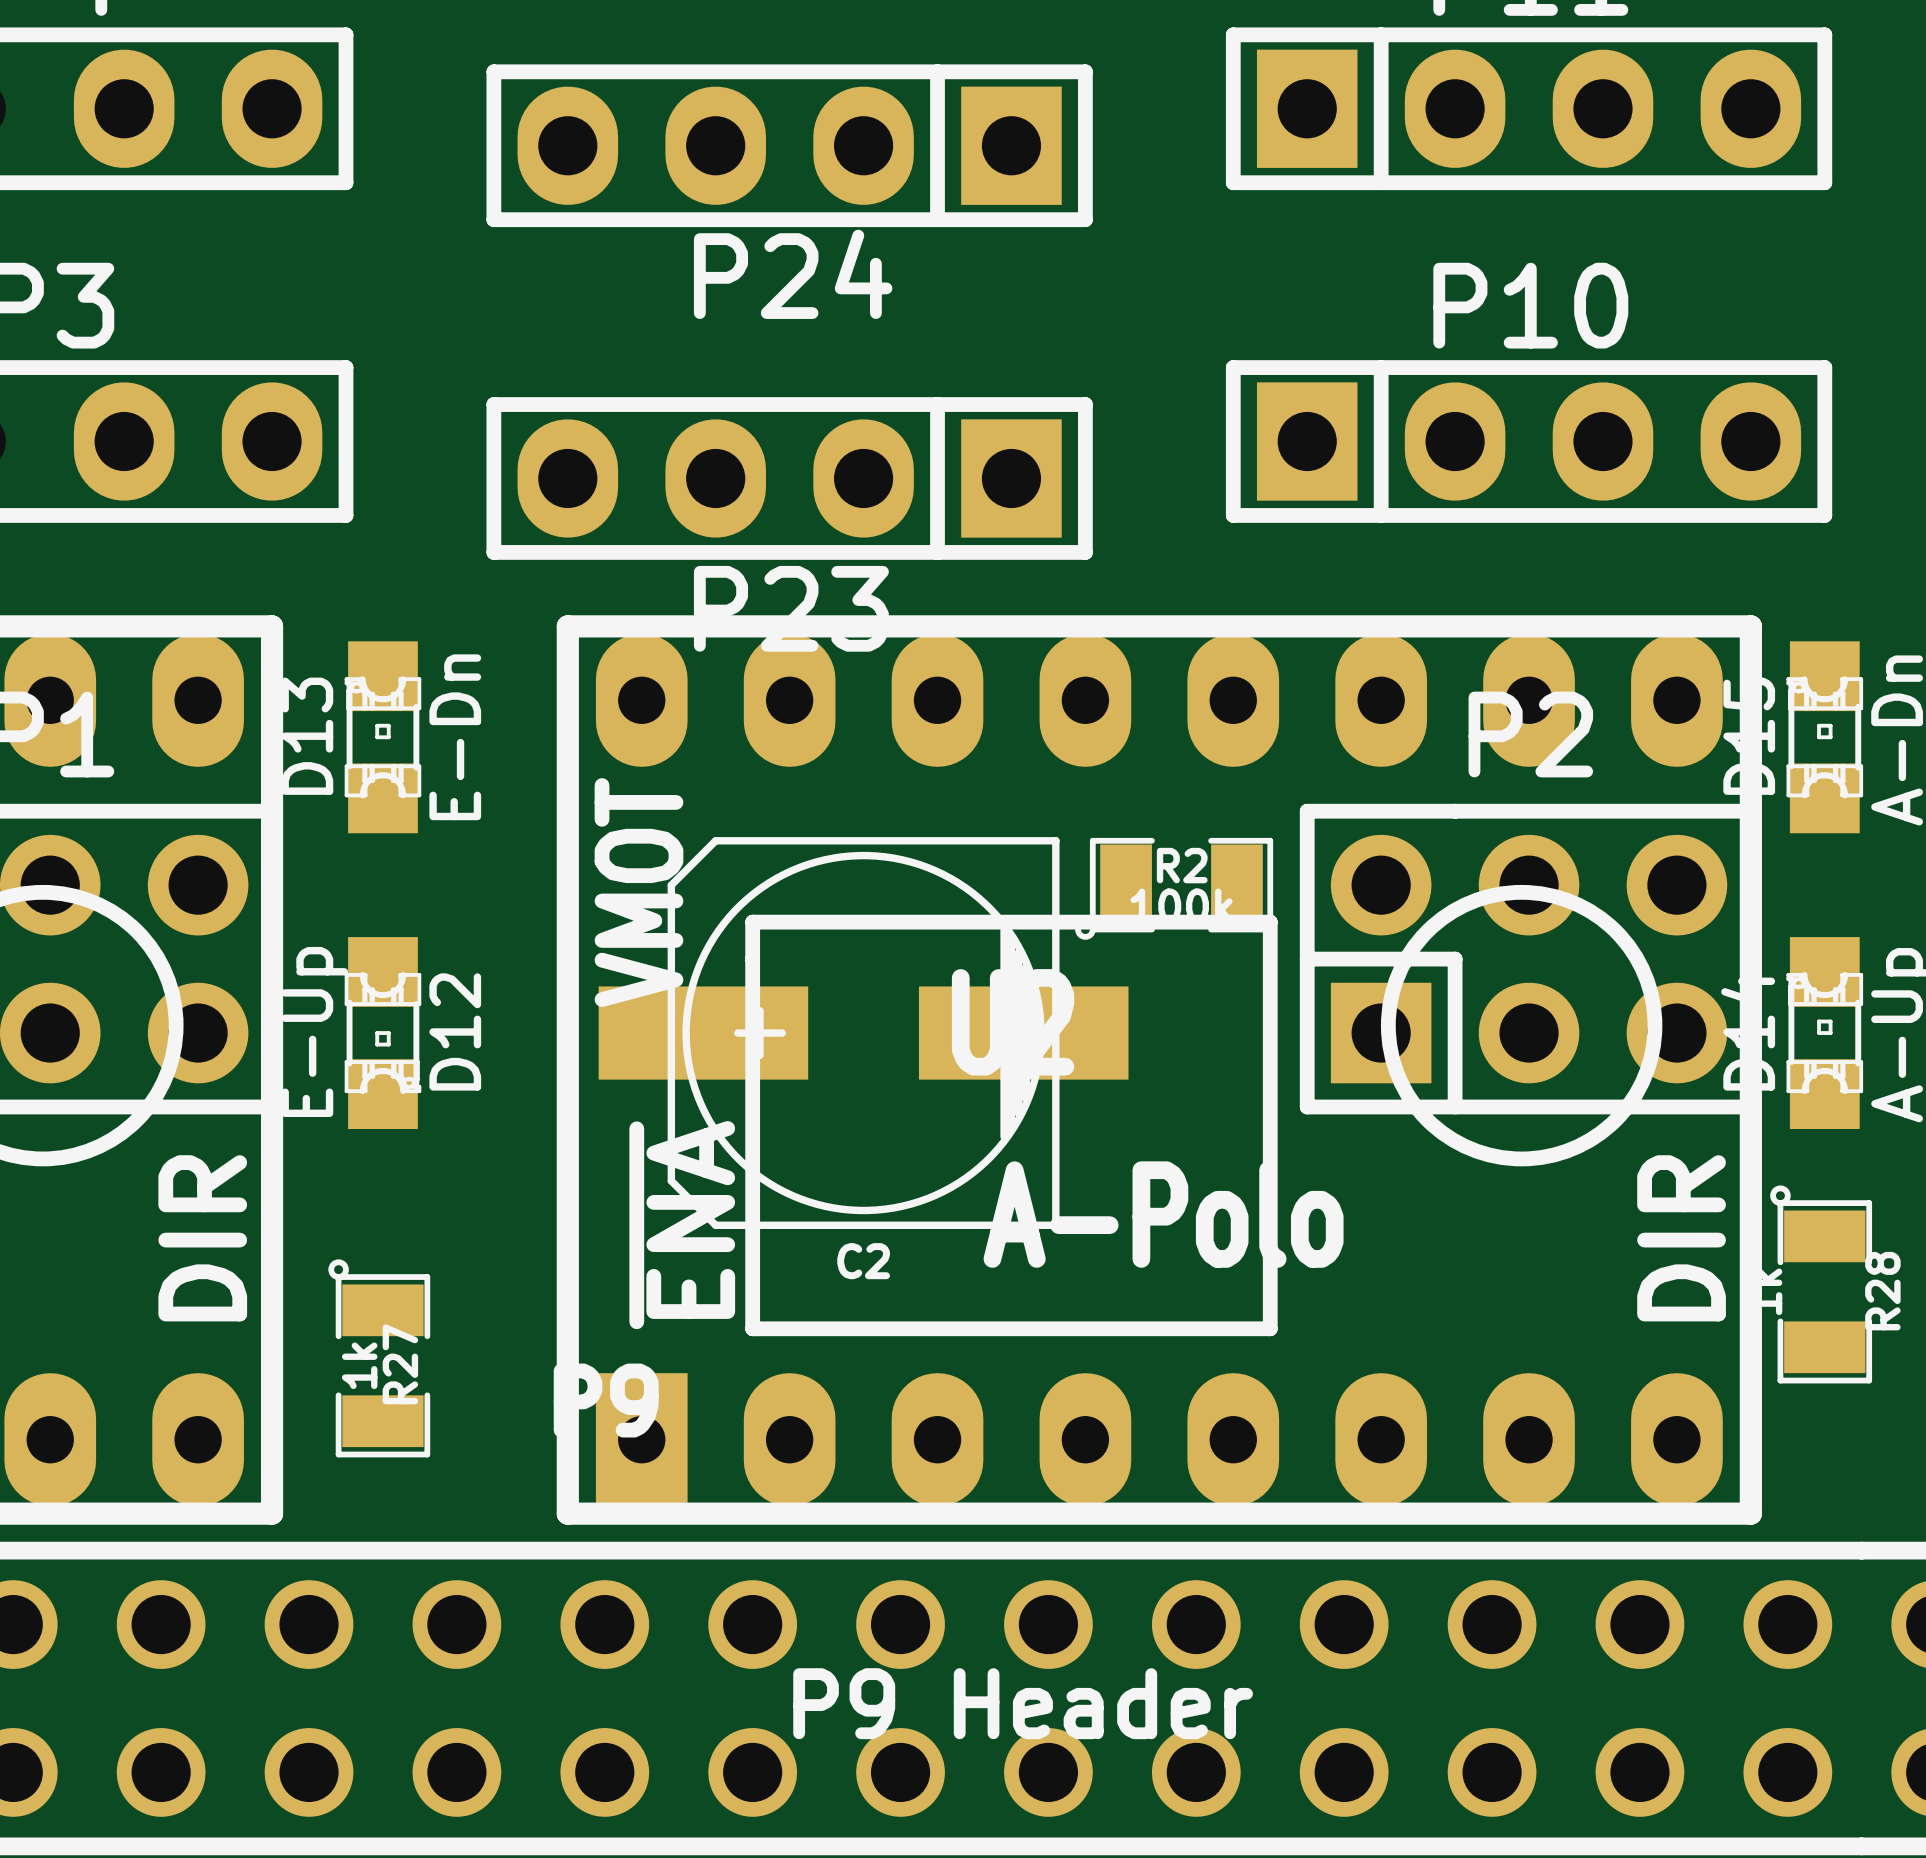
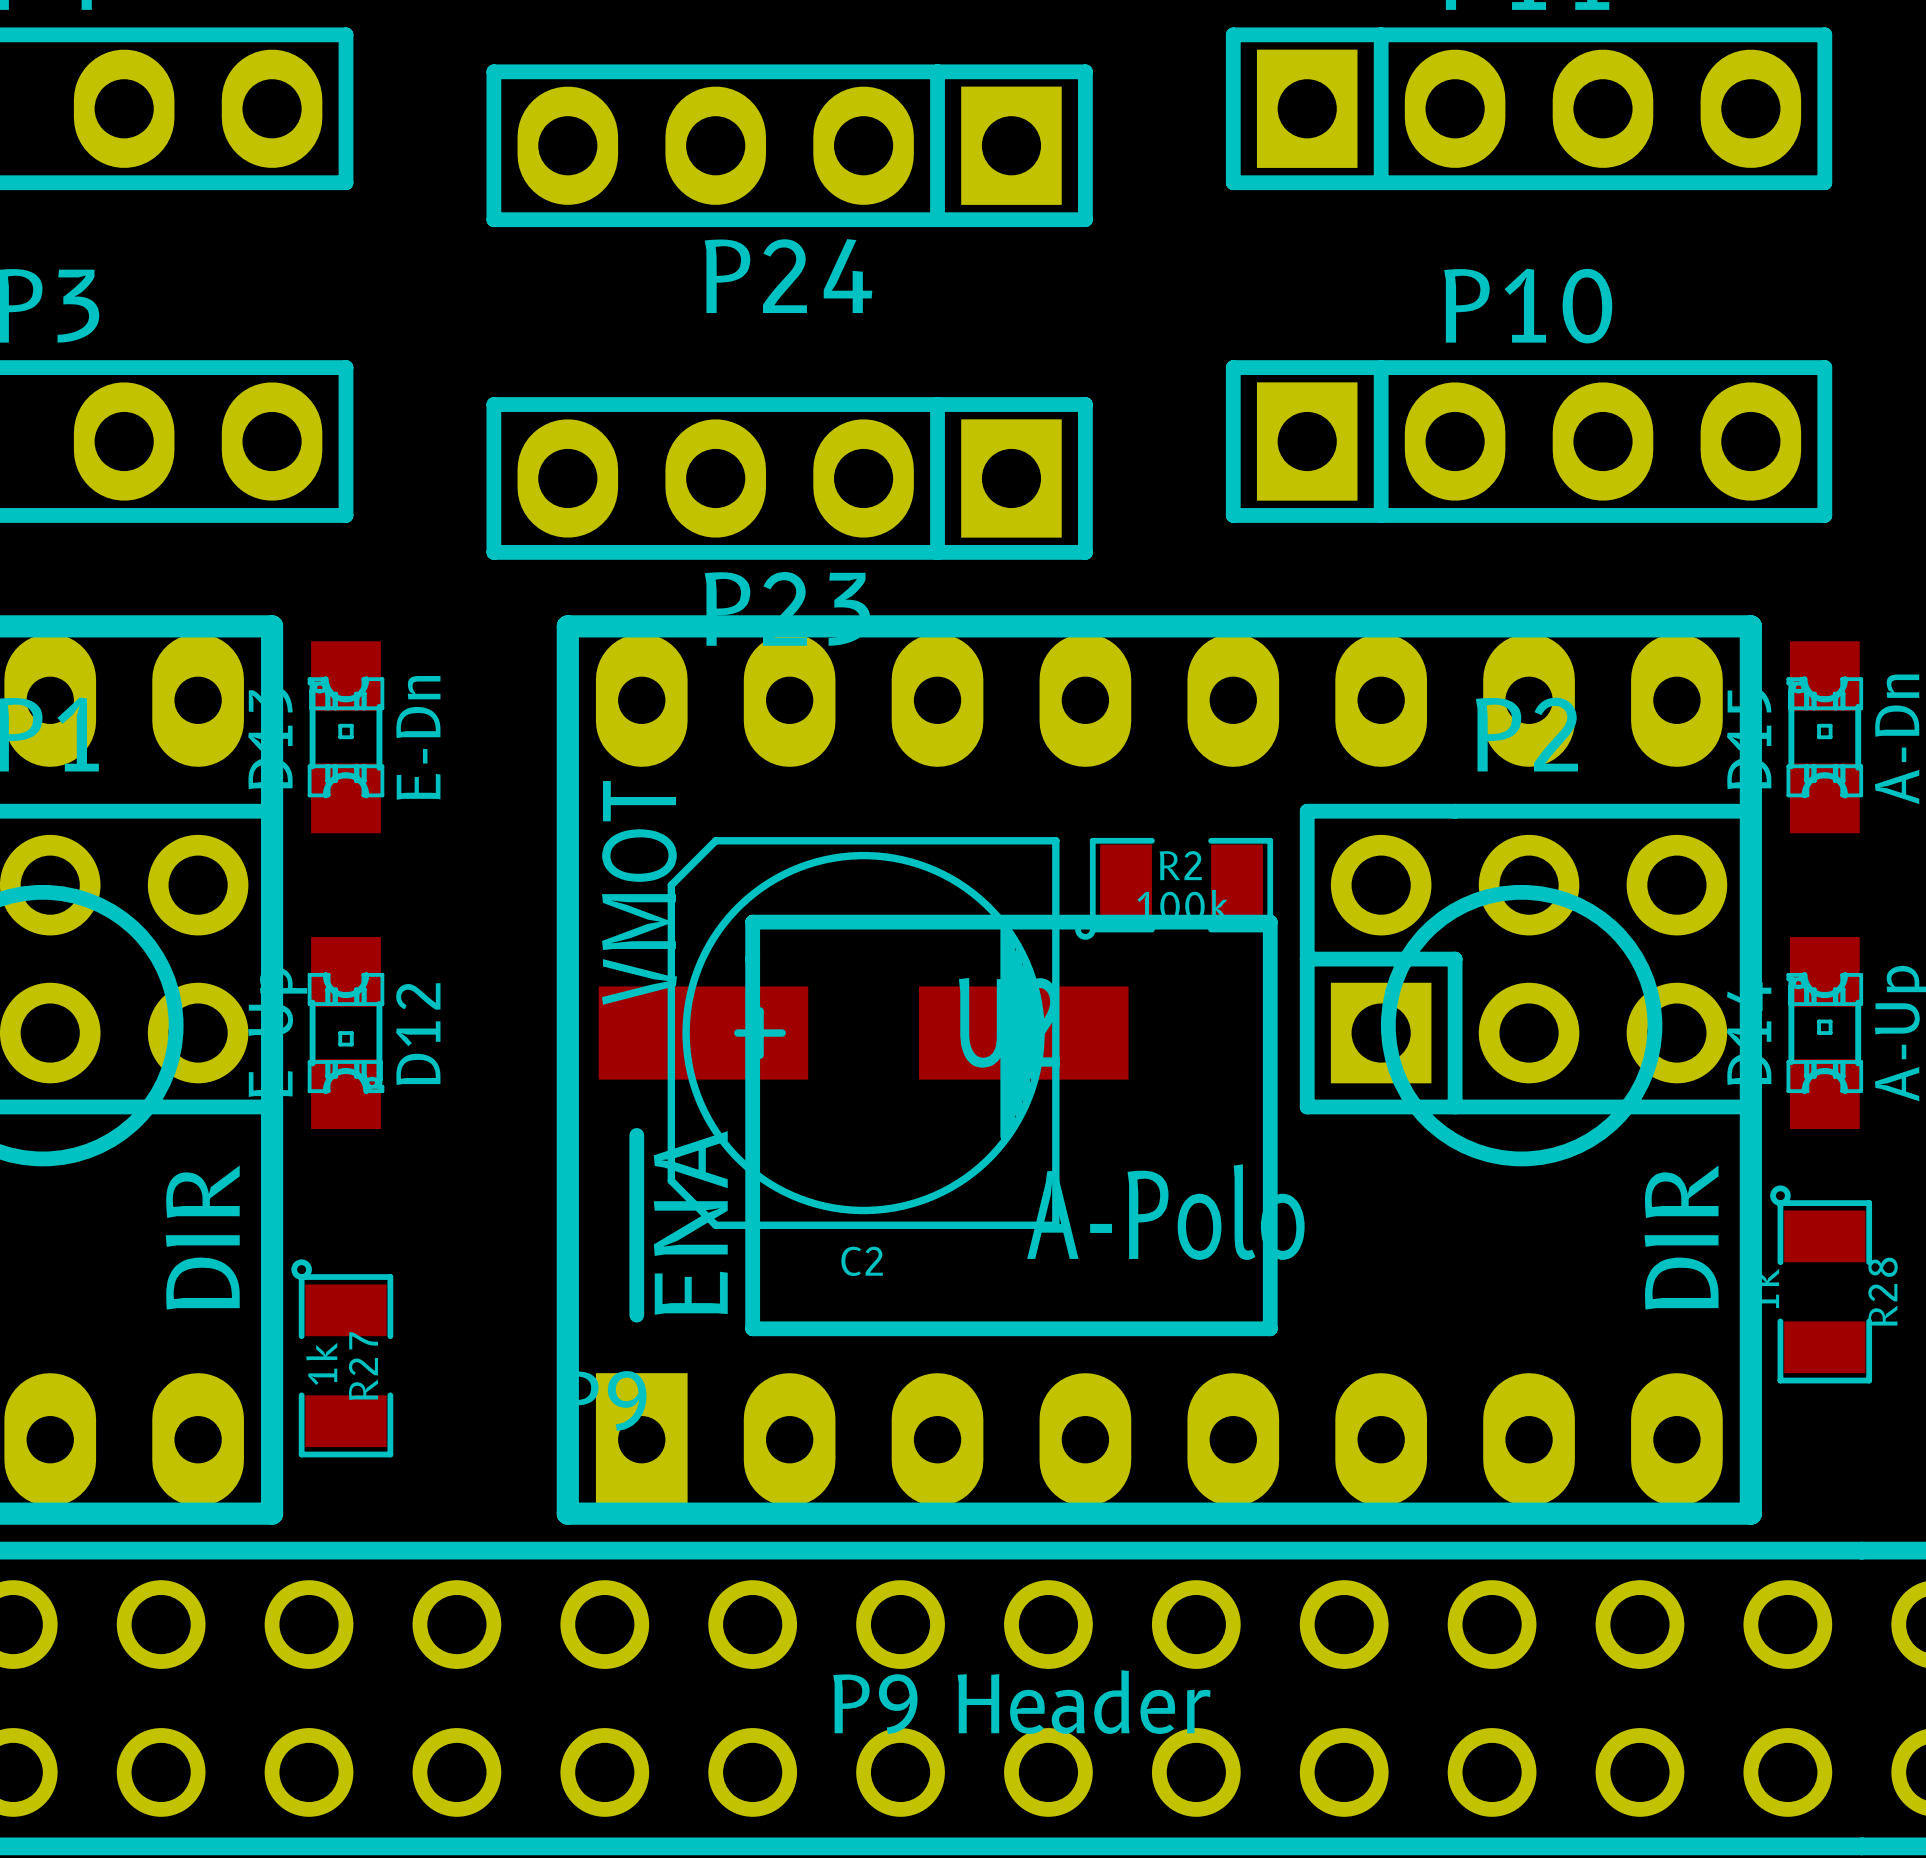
D13 position: (382, 737) -> (346, 737)
D12 position: (382, 1033) -> (346, 1033)
R27 position: (379, 1358) -> (342, 1358)

